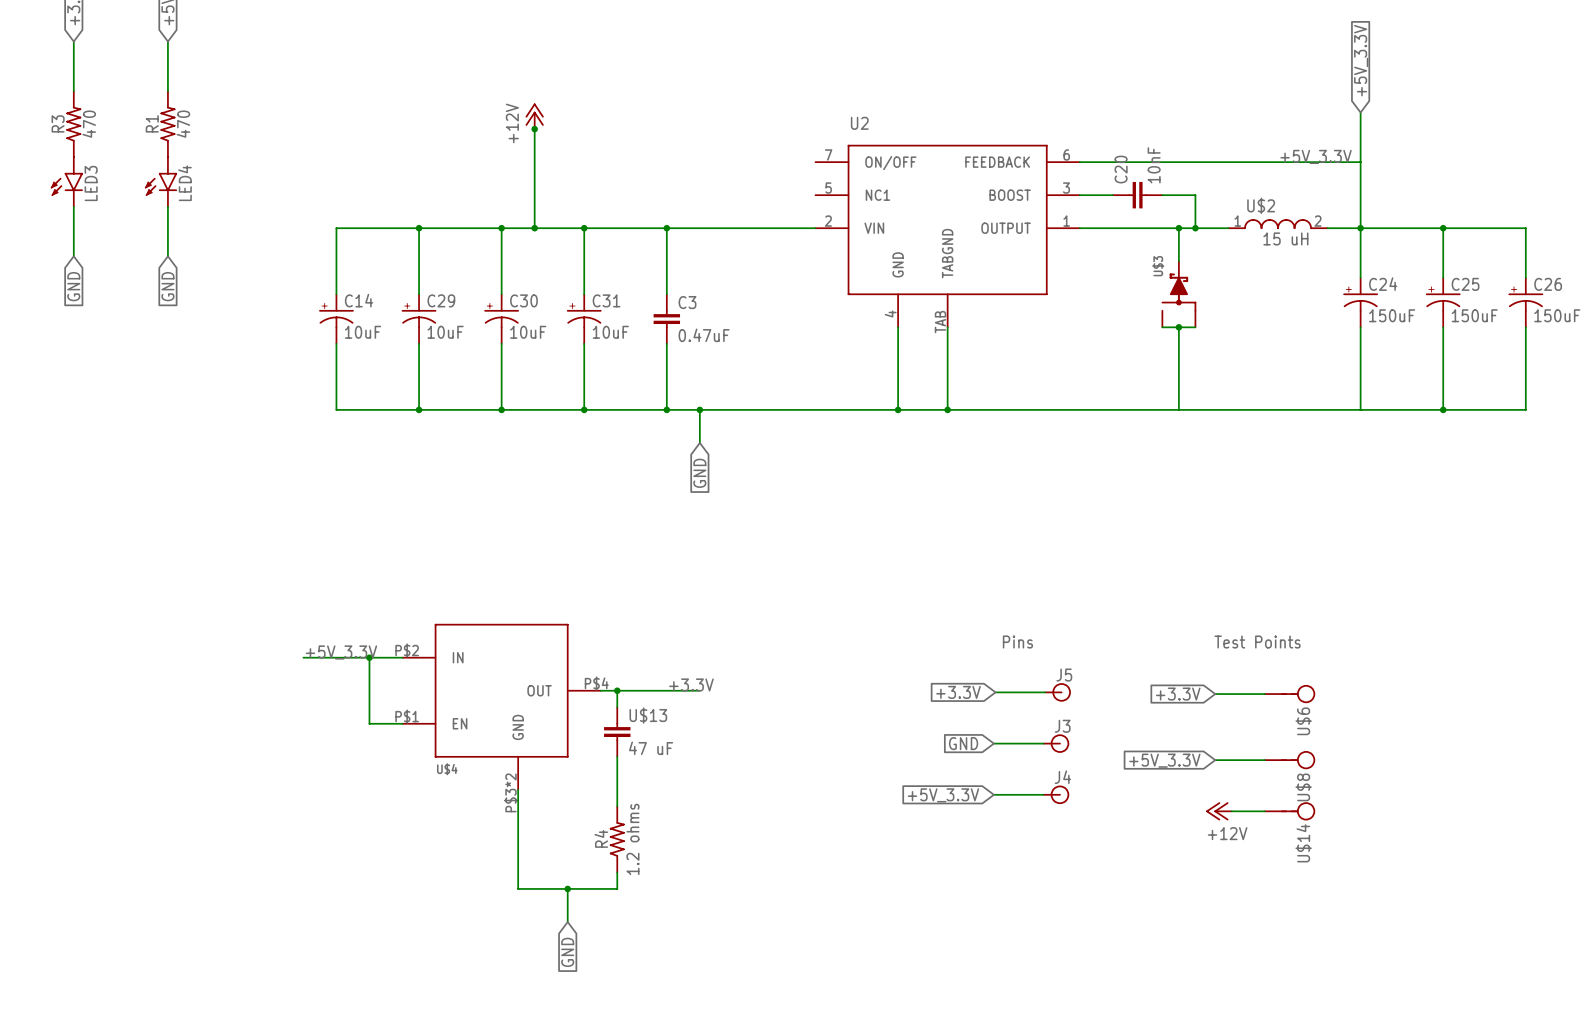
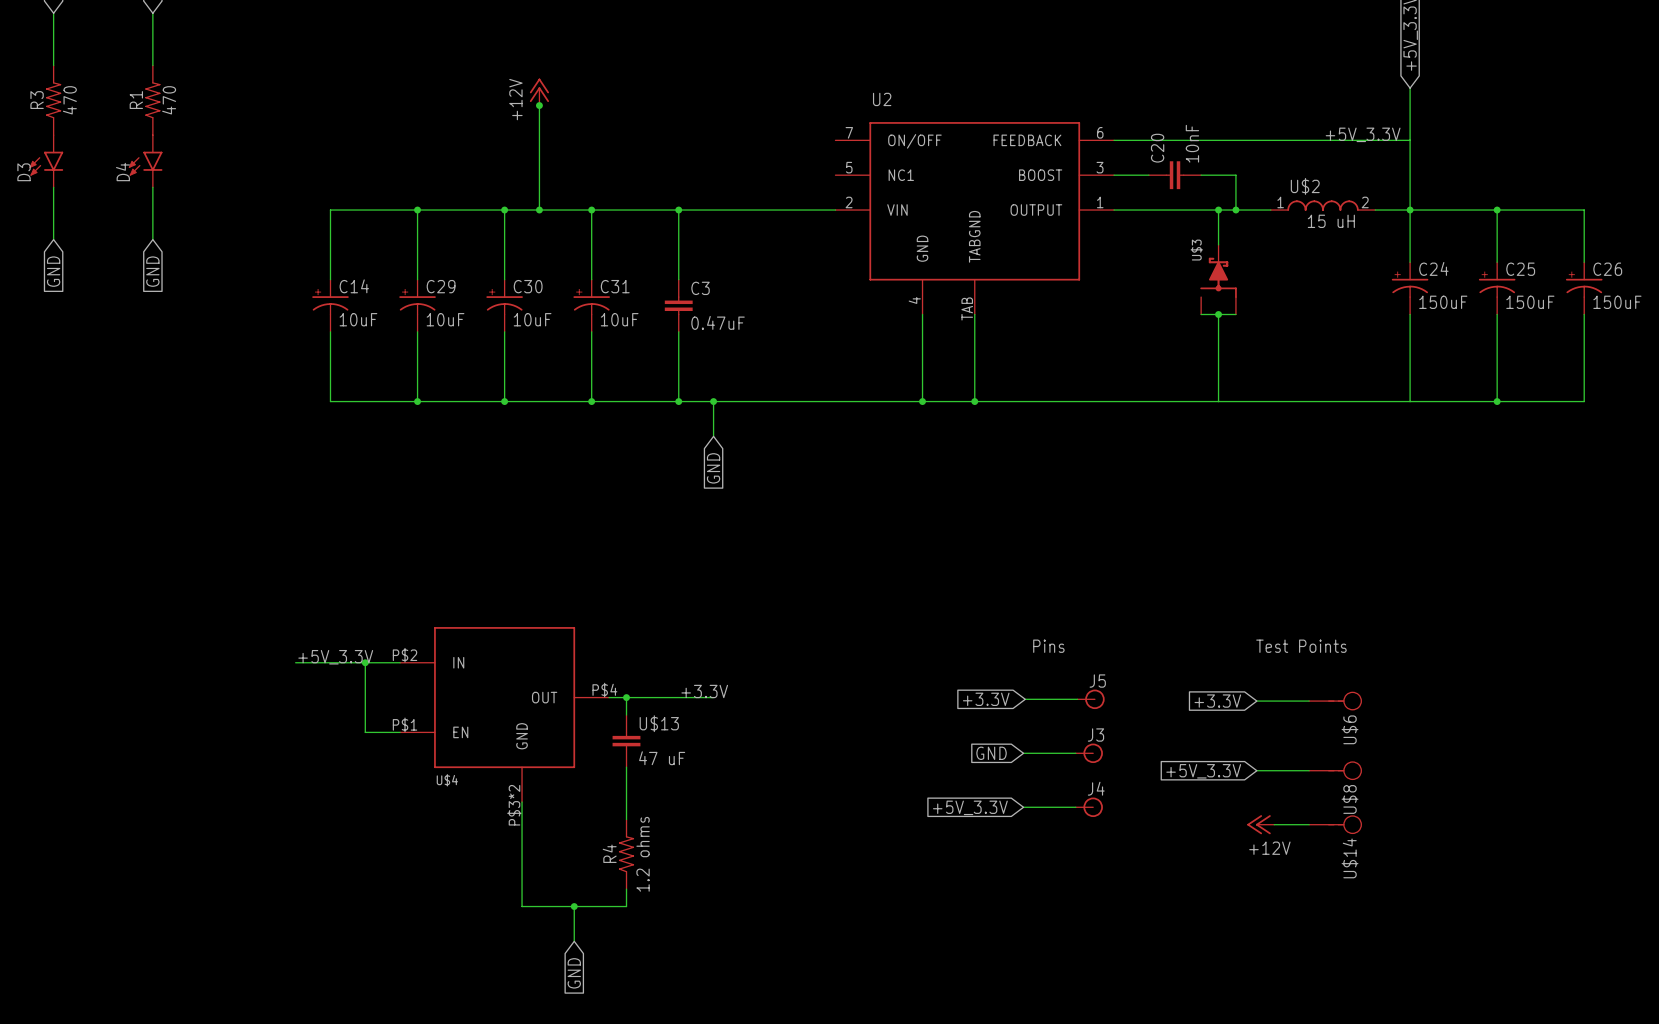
LED3: (66, 181) -> none
D3: none -> (46, 161)
LED4: (161, 181) -> none
D4: none -> (145, 161)

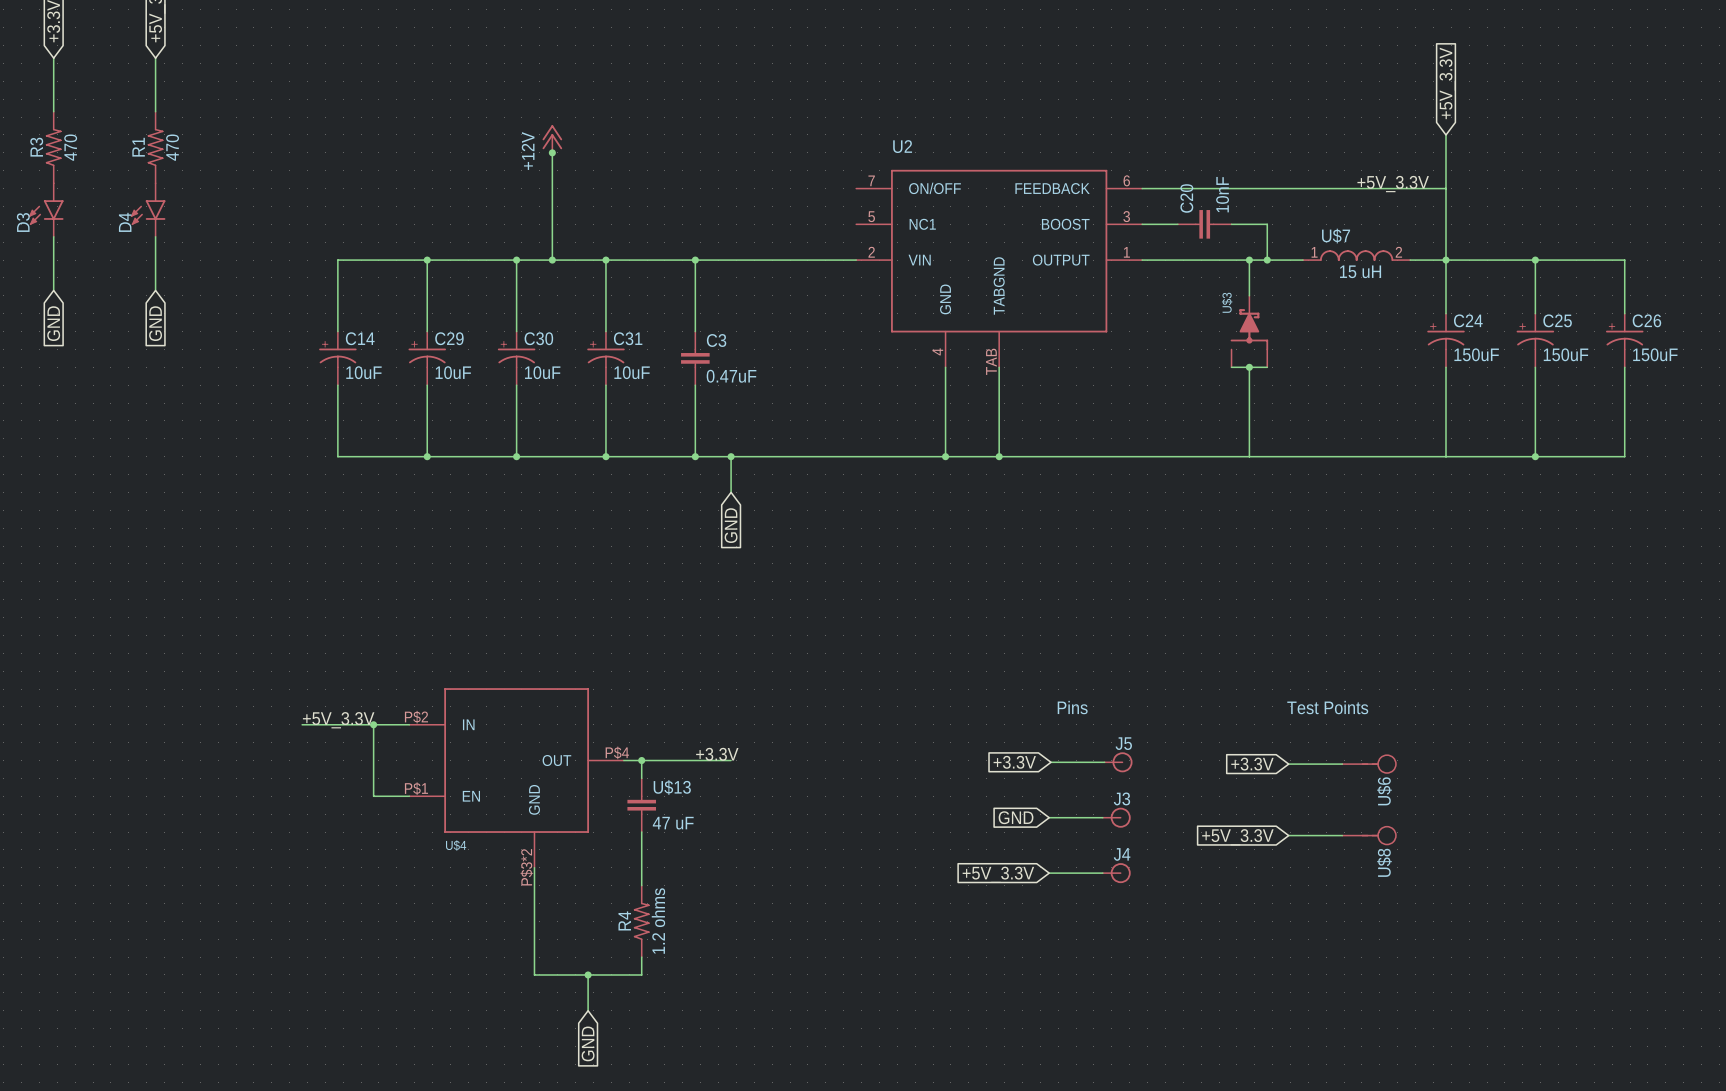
U$2 name: U$2 (1305, 186) -> U$7 (1336, 236)
power symbol: +12V (1260, 824) -> none
wire: (1274, 824) (1309, 824) -> none
U$14: (1335, 824) -> none

